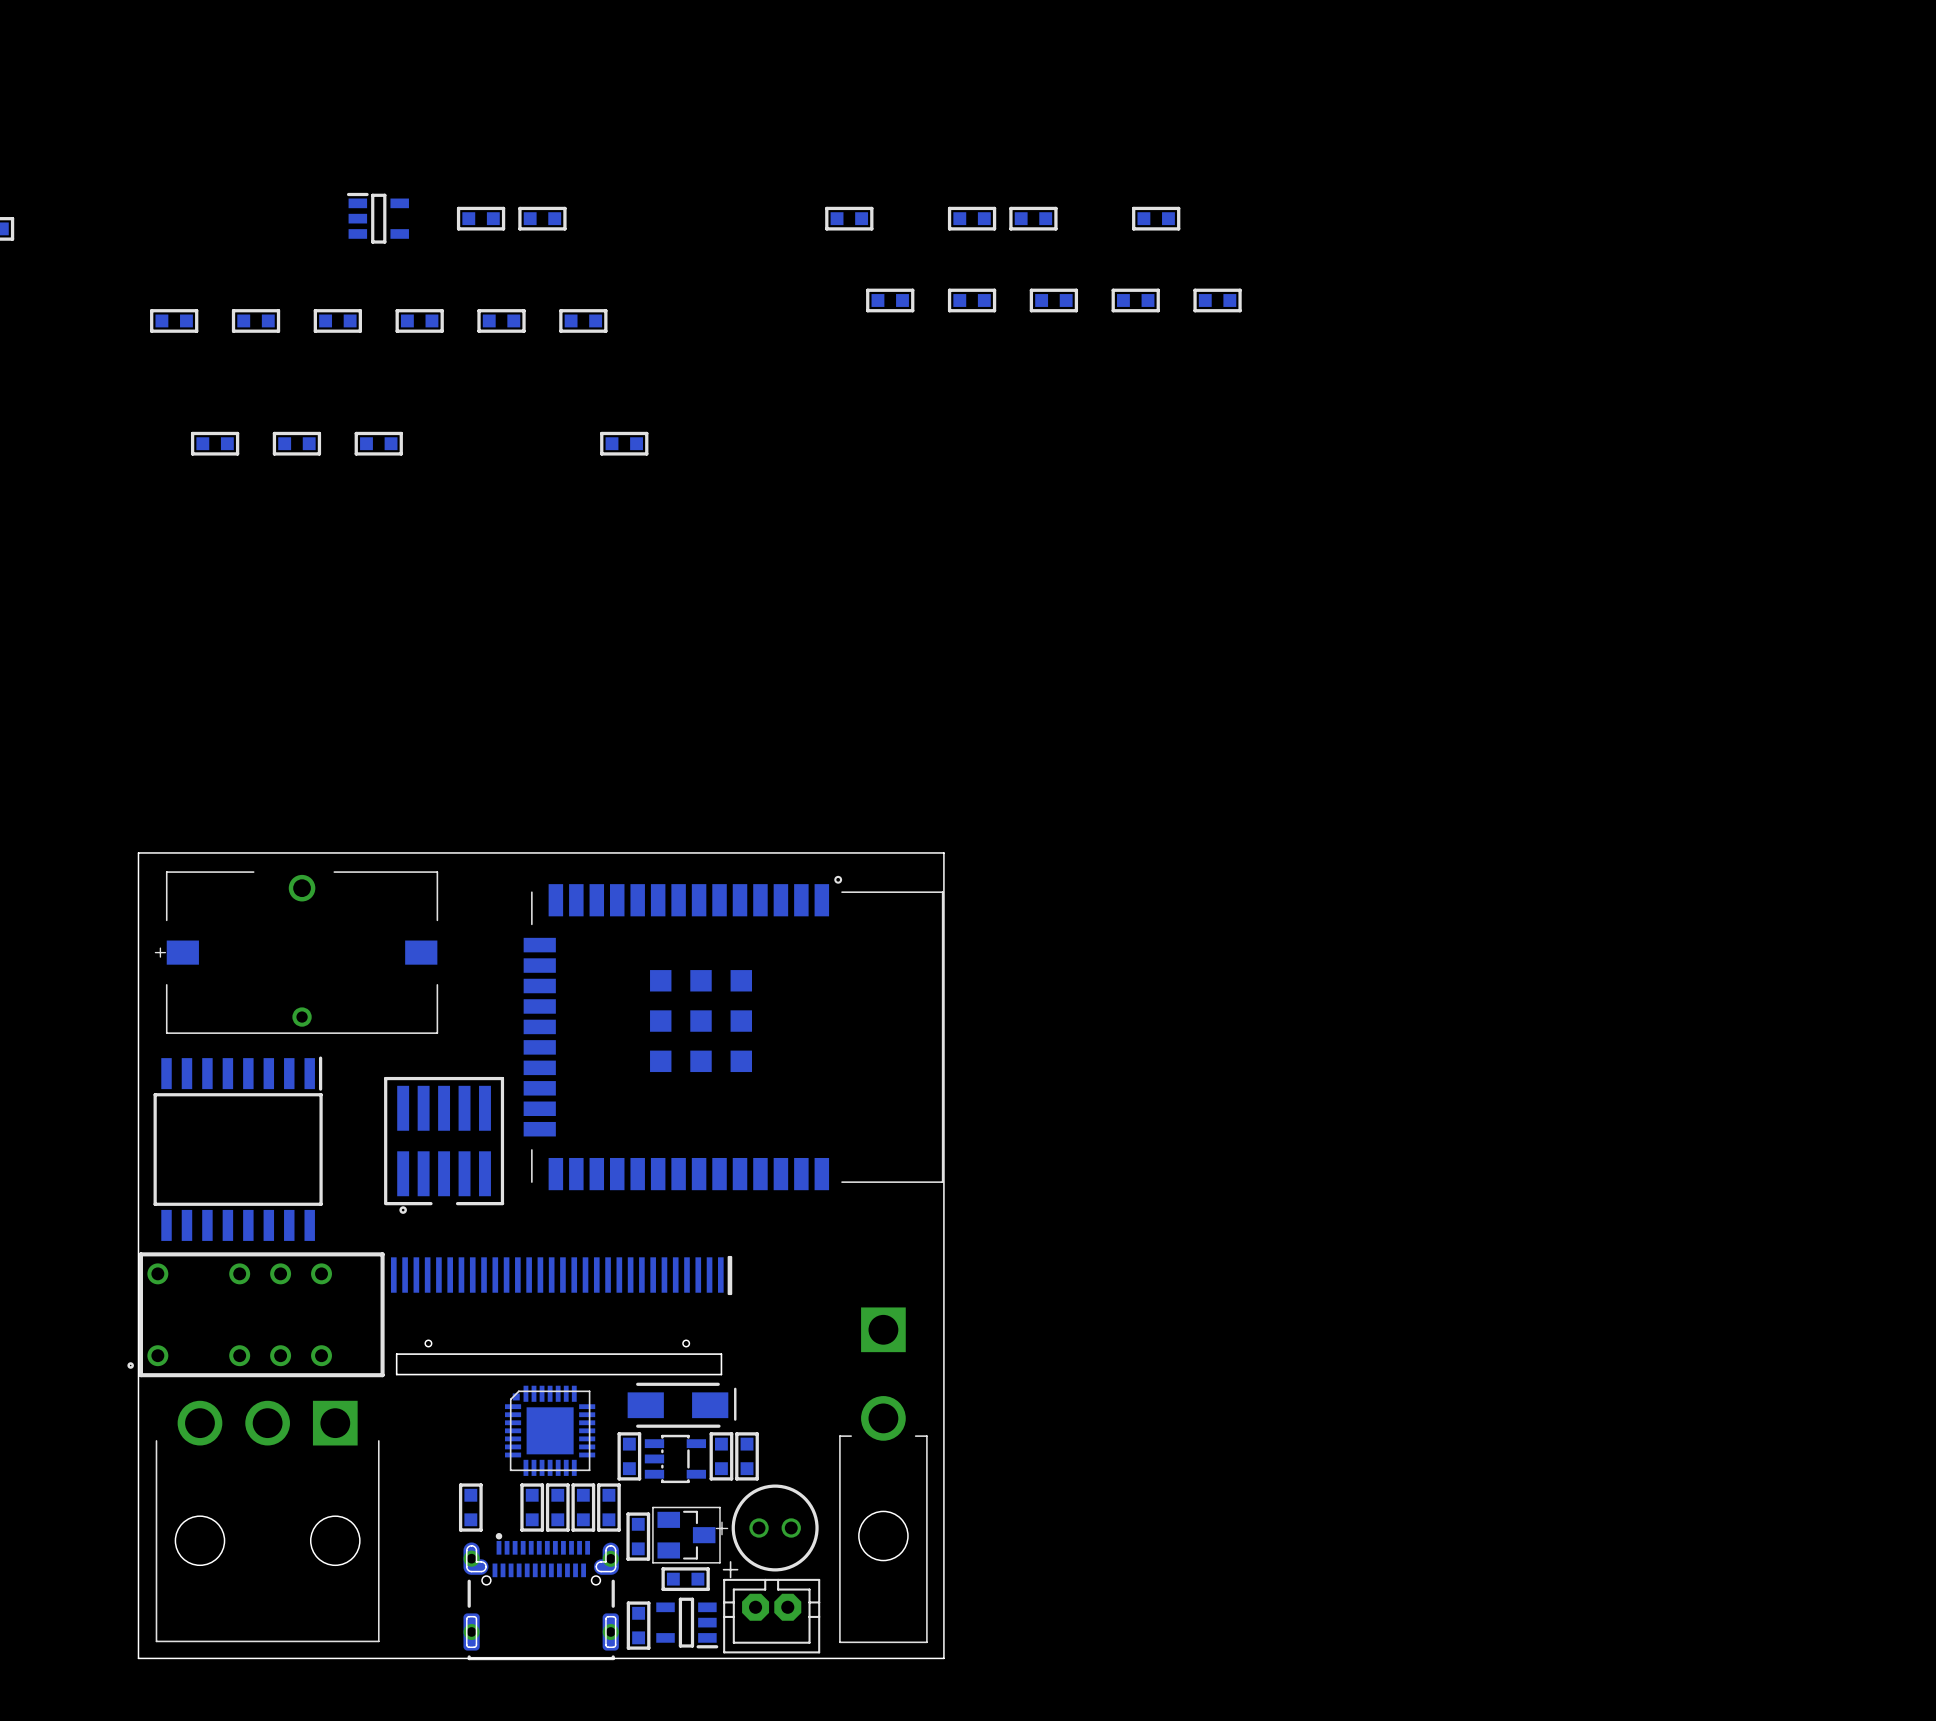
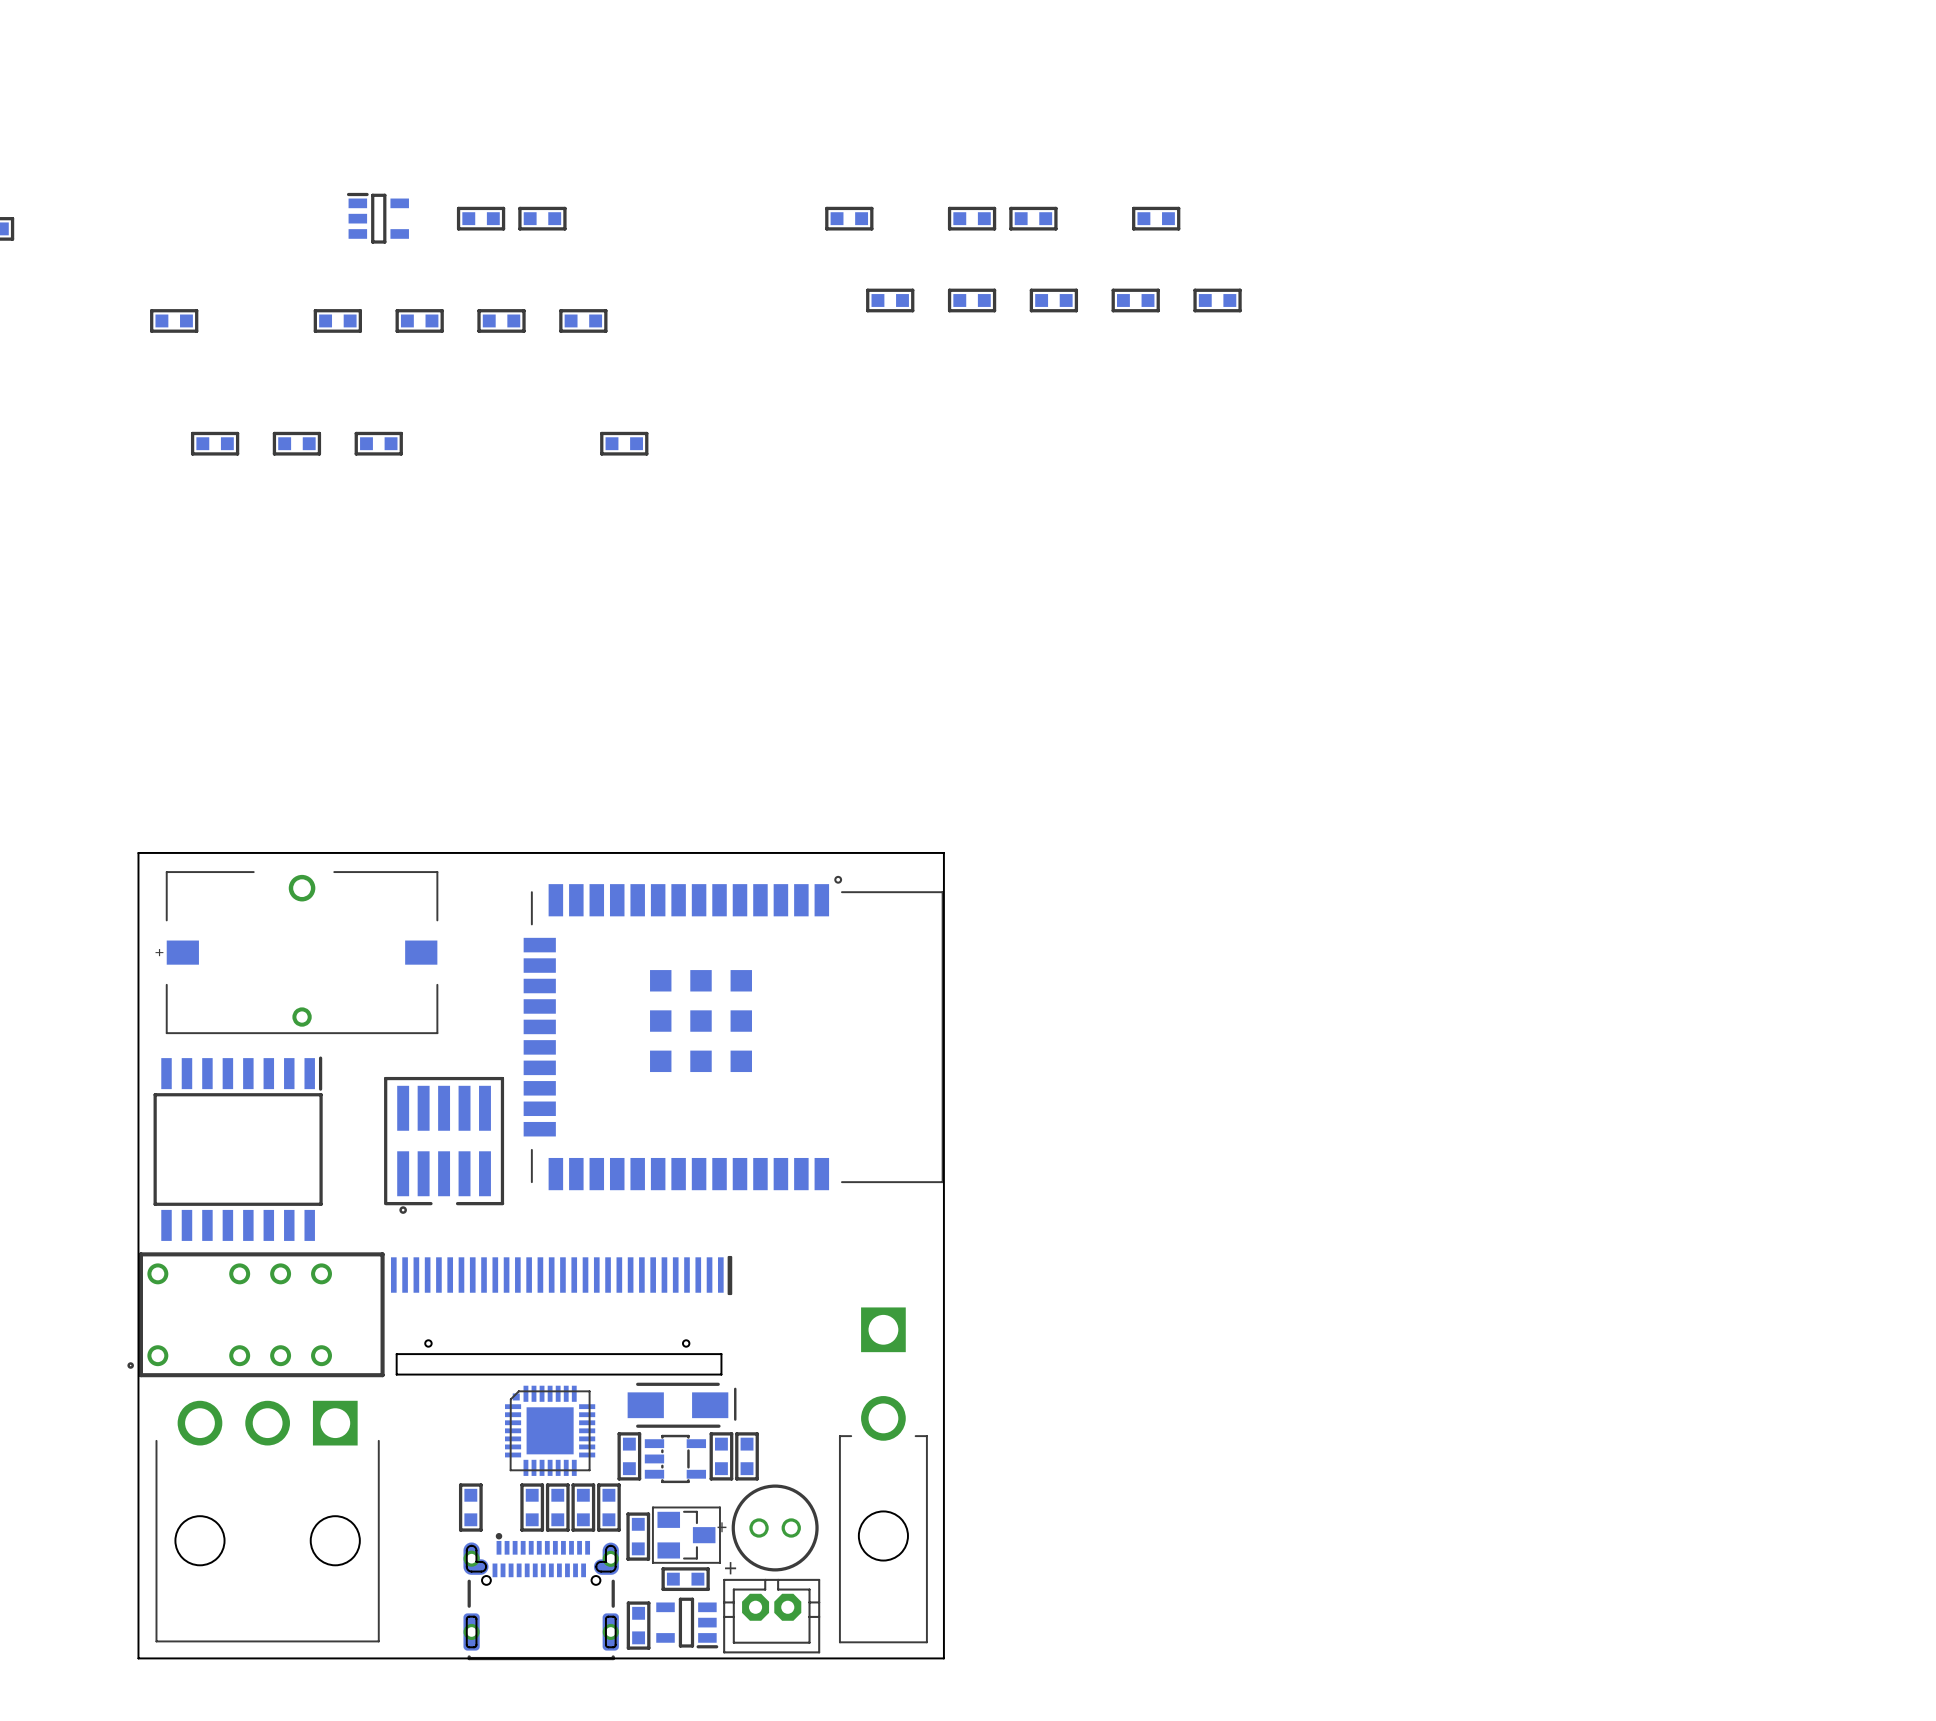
part: (256, 320) -> none

